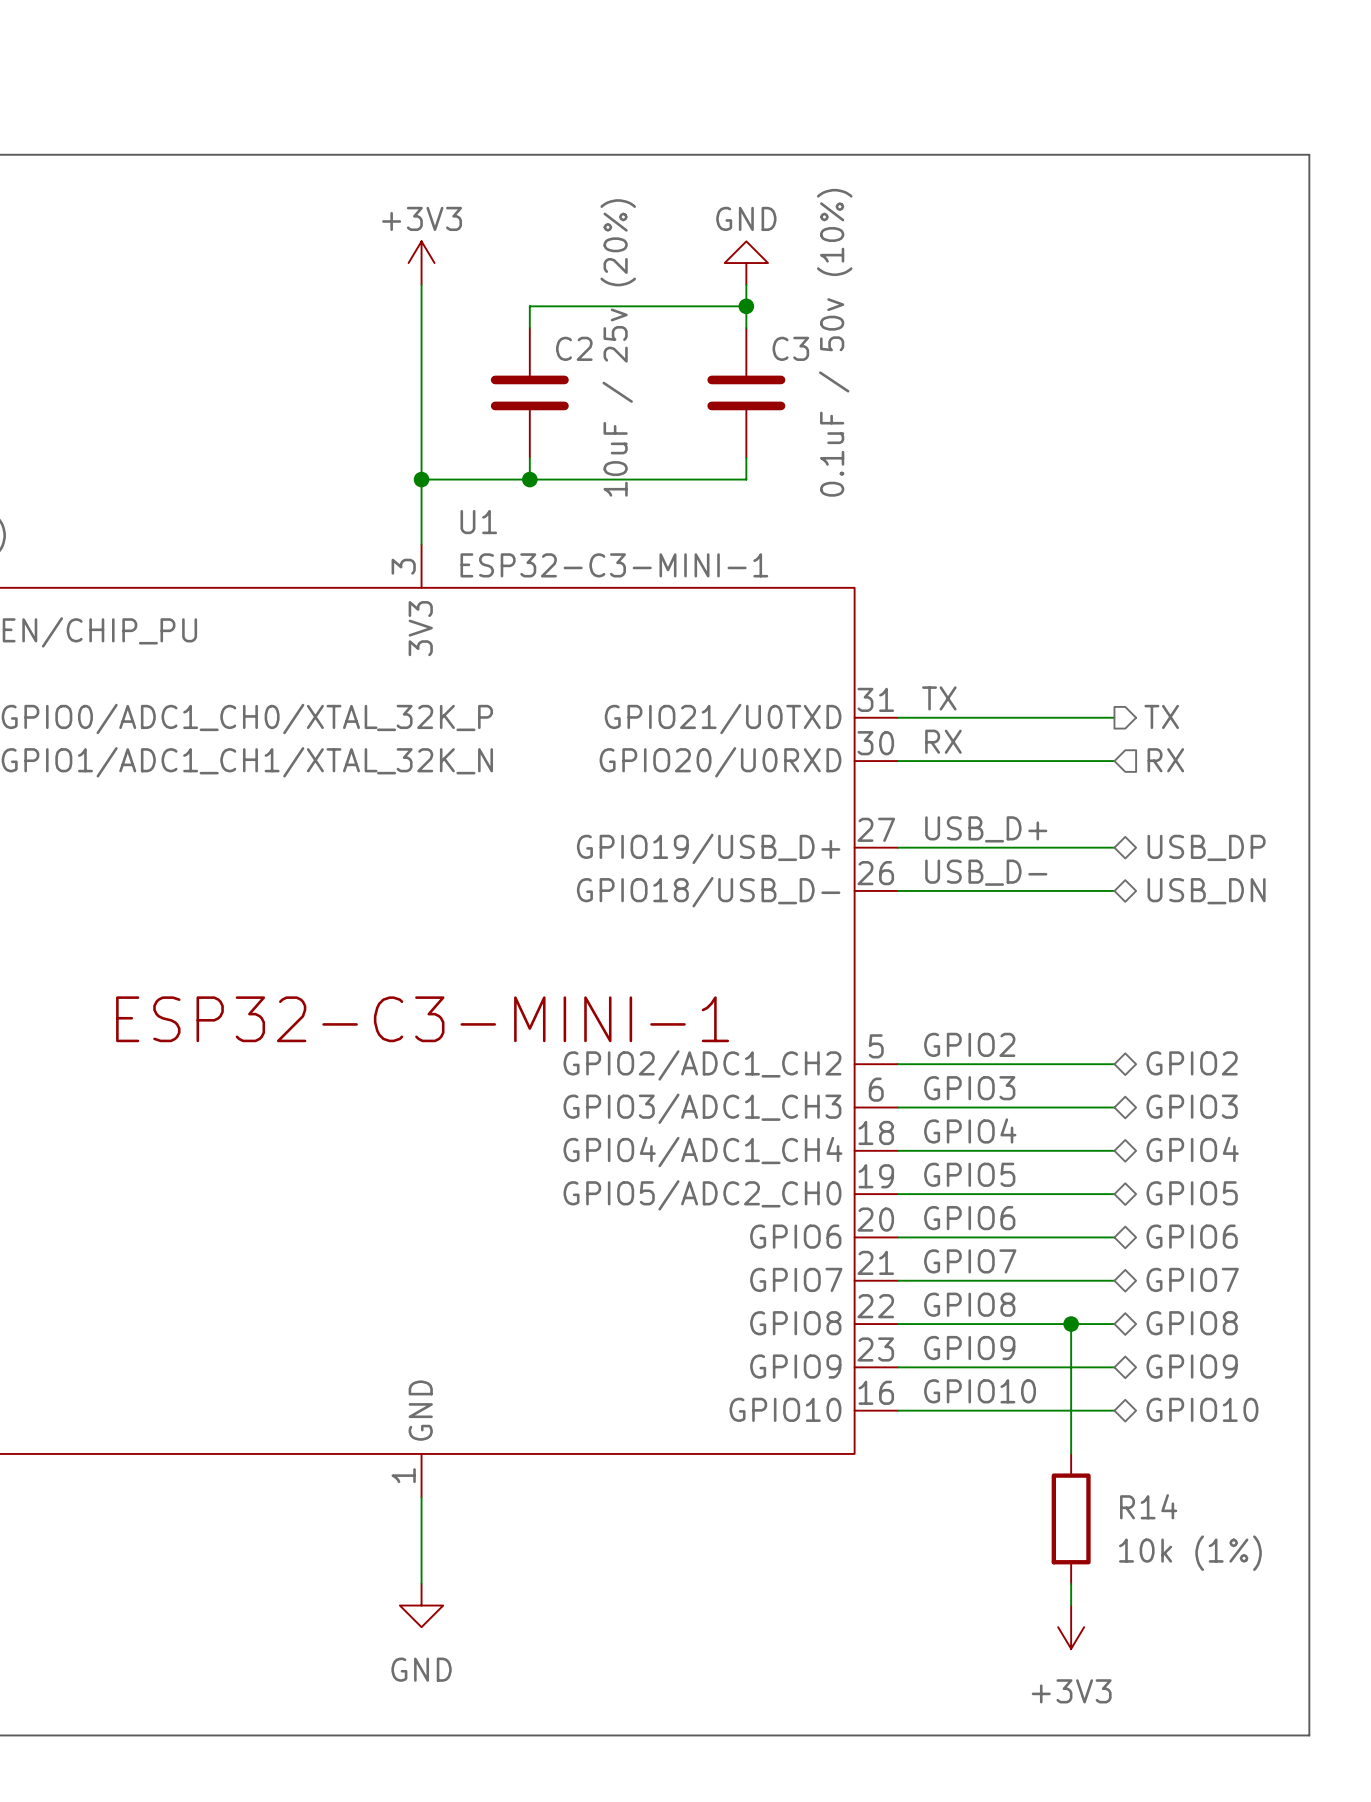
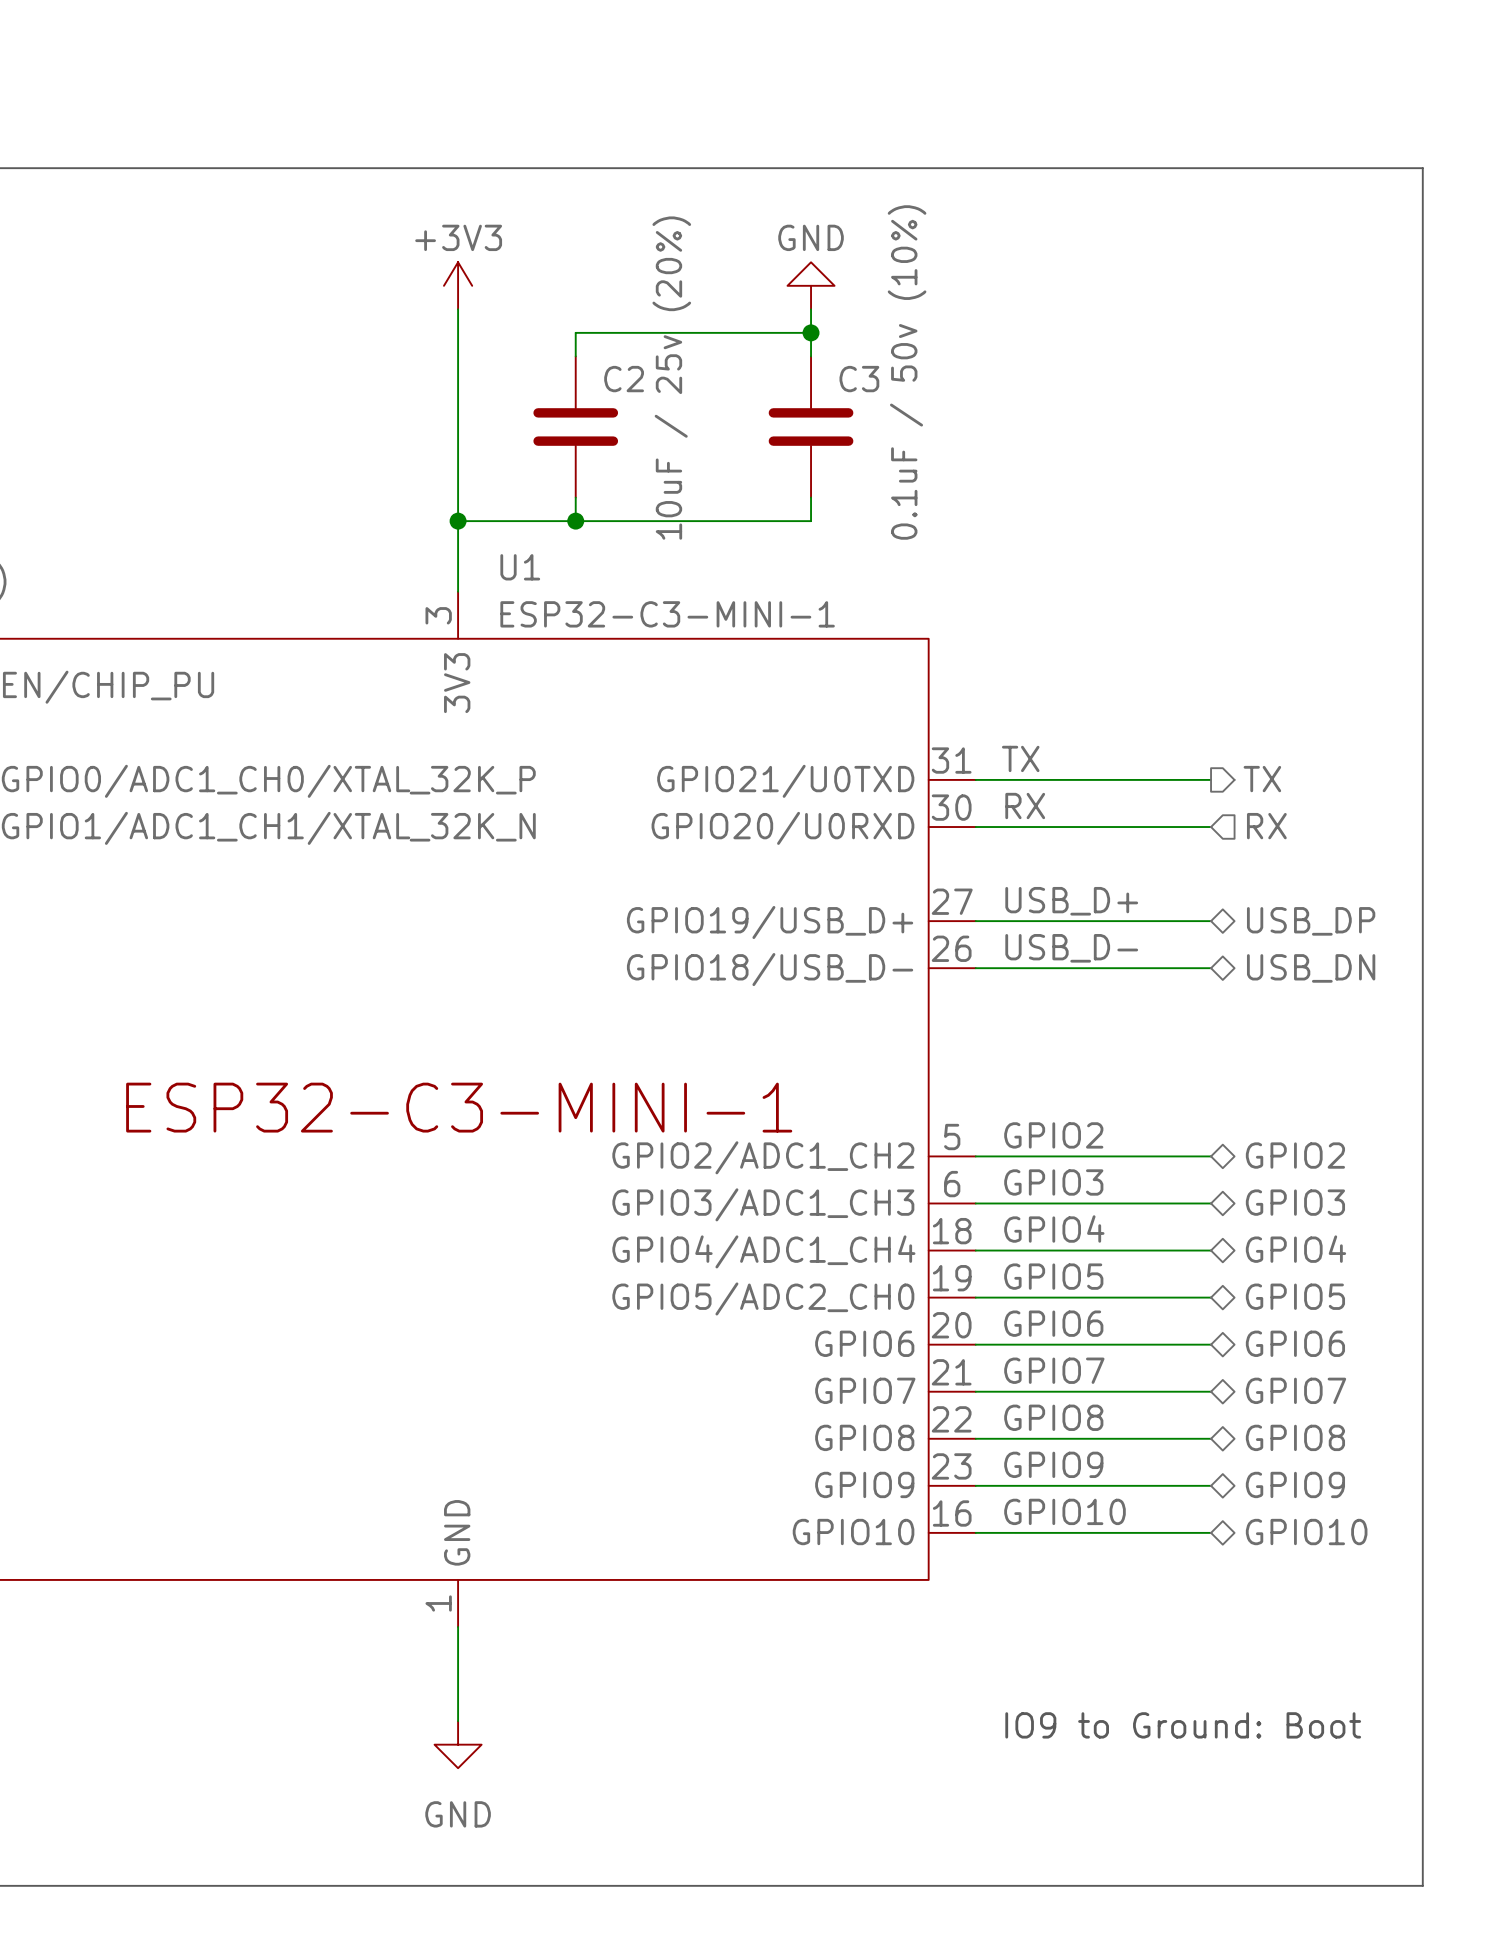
wire: (1071, 1324) (1071, 1453) -> none
junction: (1071, 1324) -> none
R14: 10k (1%) (1071, 1518) -> none
wire: (1071, 1583) (1071, 1605) -> none
text: none -> IO9 to Ground: Boot (1183, 1725)
power symbol: +3V3 (1071, 1627) -> none

